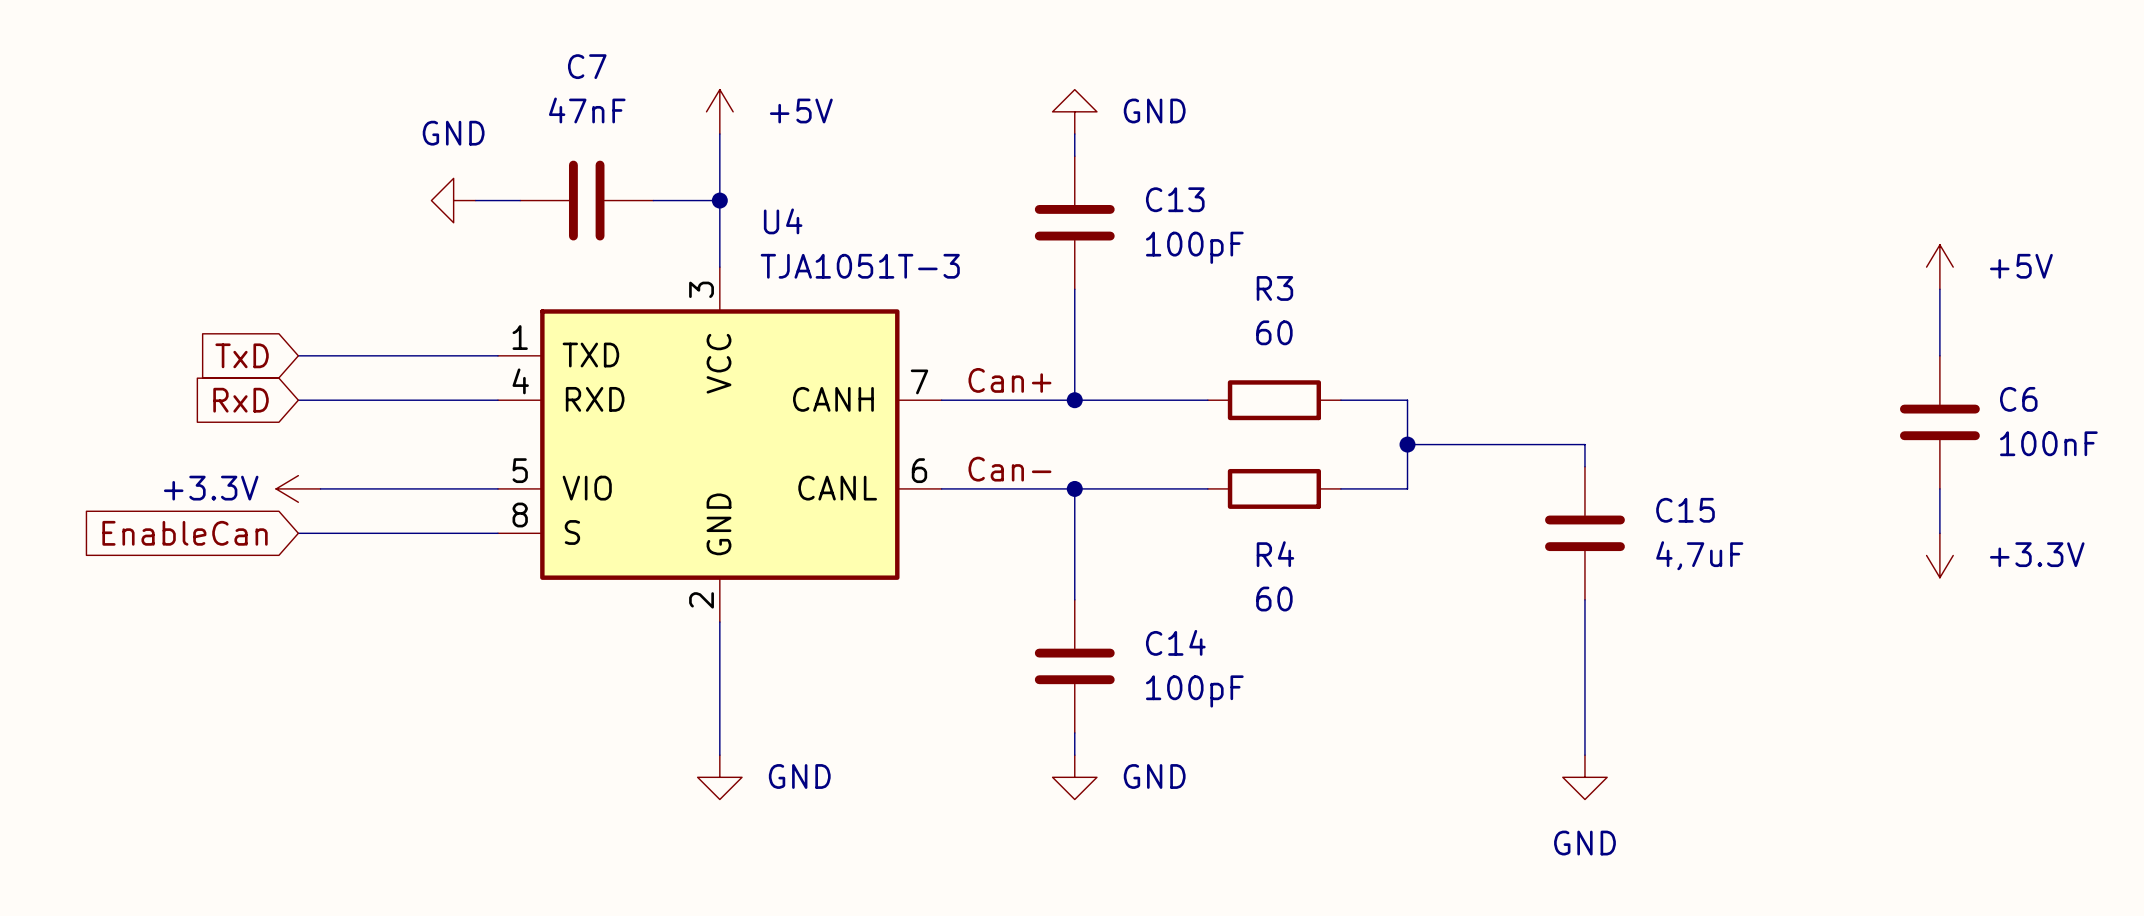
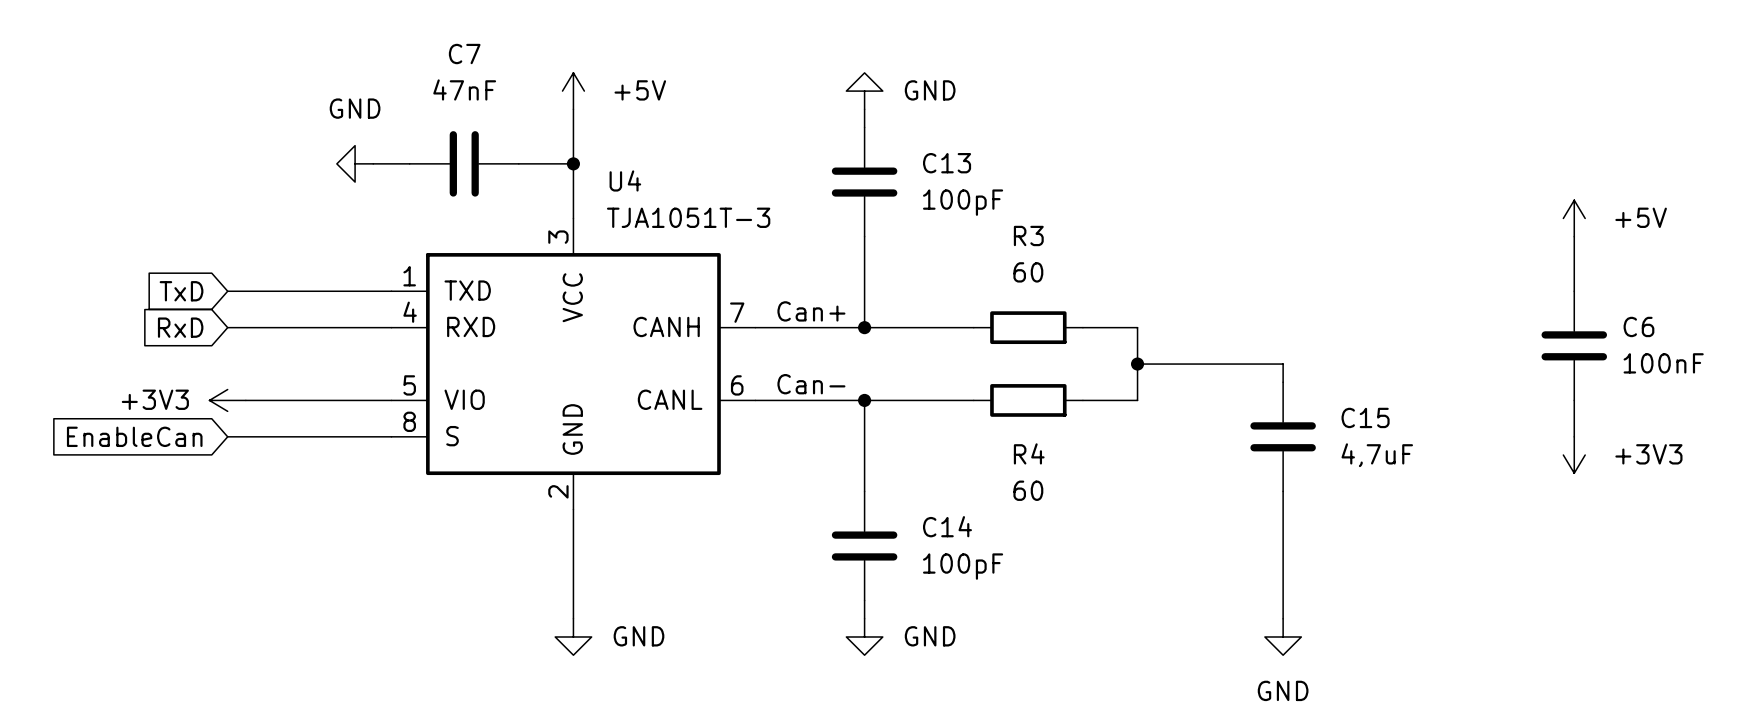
power symbol: +3.3V (298, 488) -> +3V3 (227, 400)
power symbol: +3.3V (1939, 555) -> +3V3 (1574, 455)

